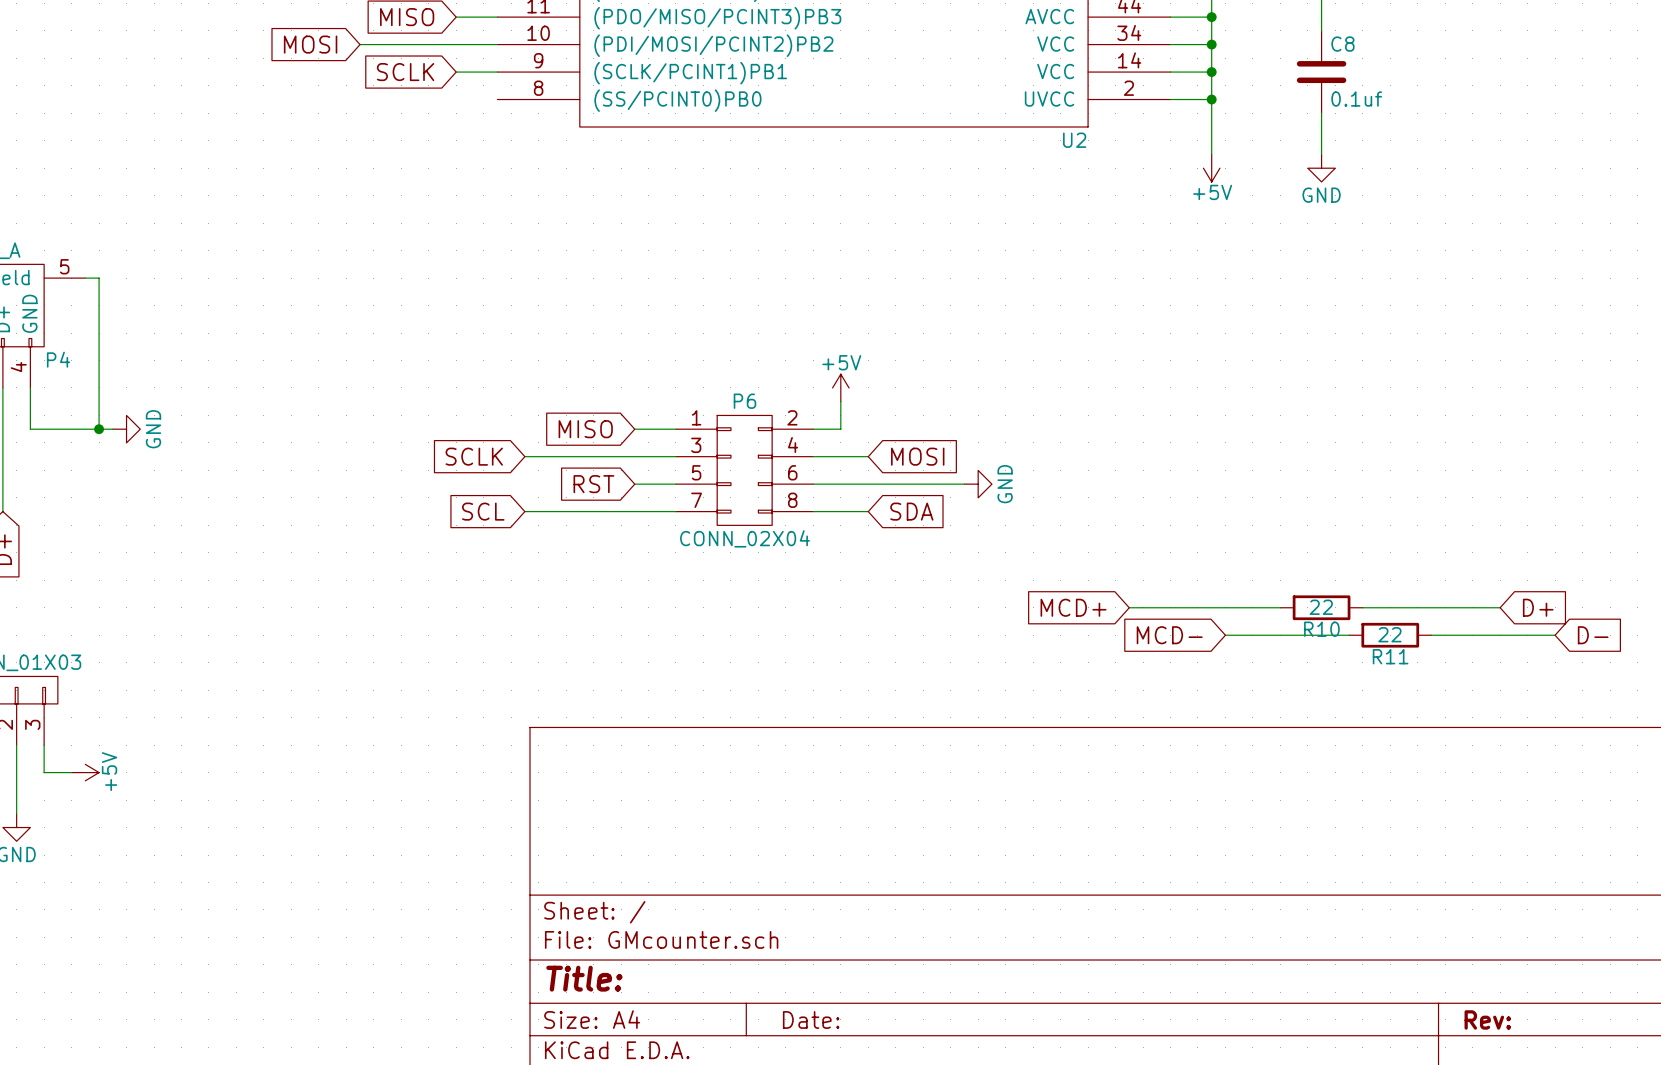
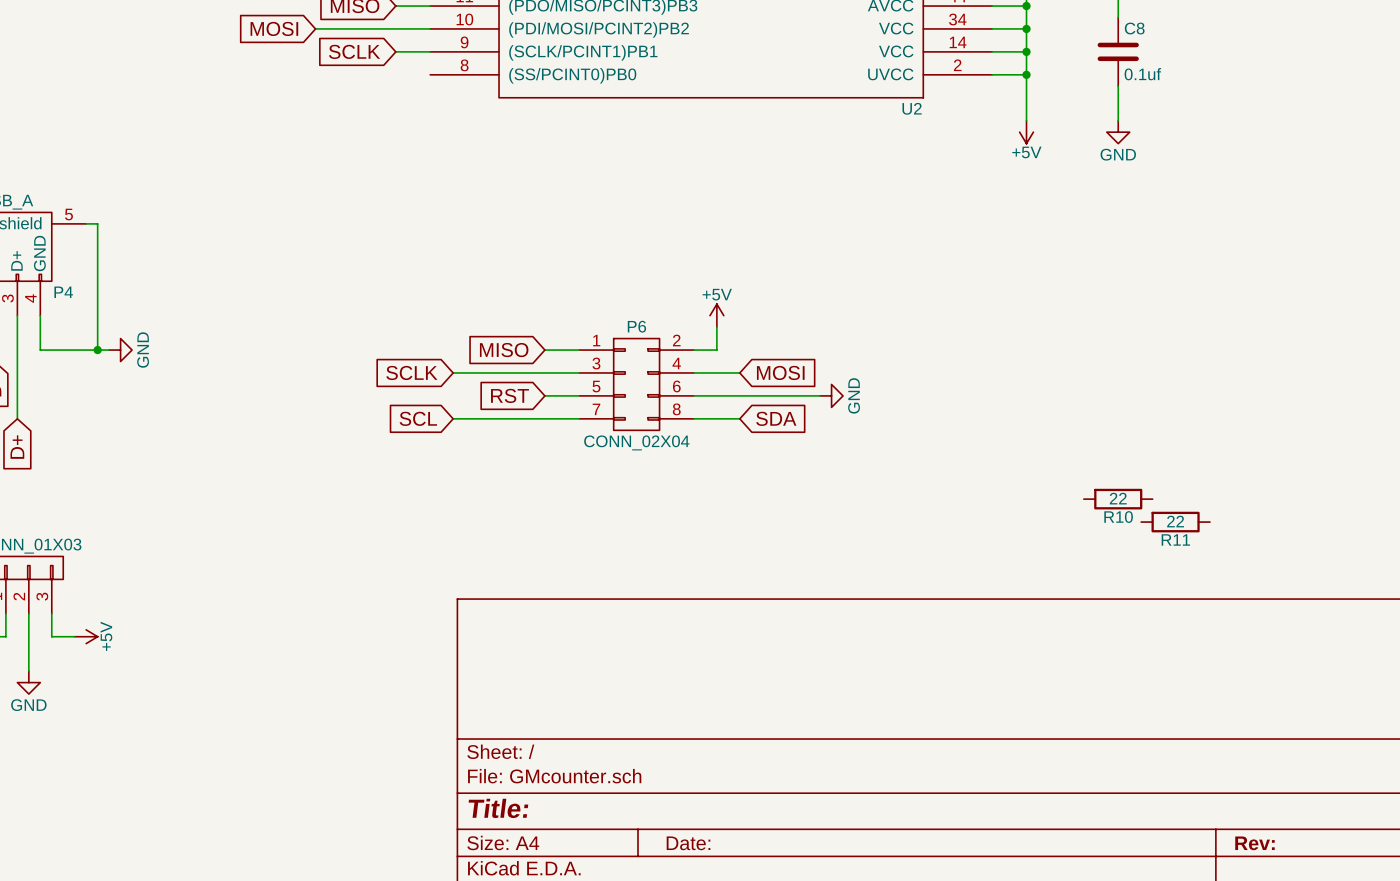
global label: MCD+ (1073, 607) -> none
wire: (1129, 607) (1280, 607) -> none
wire: (1362, 607) (1500, 607) -> none
global label: D+ (1538, 607) -> none
global label: MCD- (1169, 635) -> none
wire: (1225, 635) (1349, 635) -> none
wire: (1431, 635) (1555, 635) -> none
global label: D- (1593, 635) -> none

